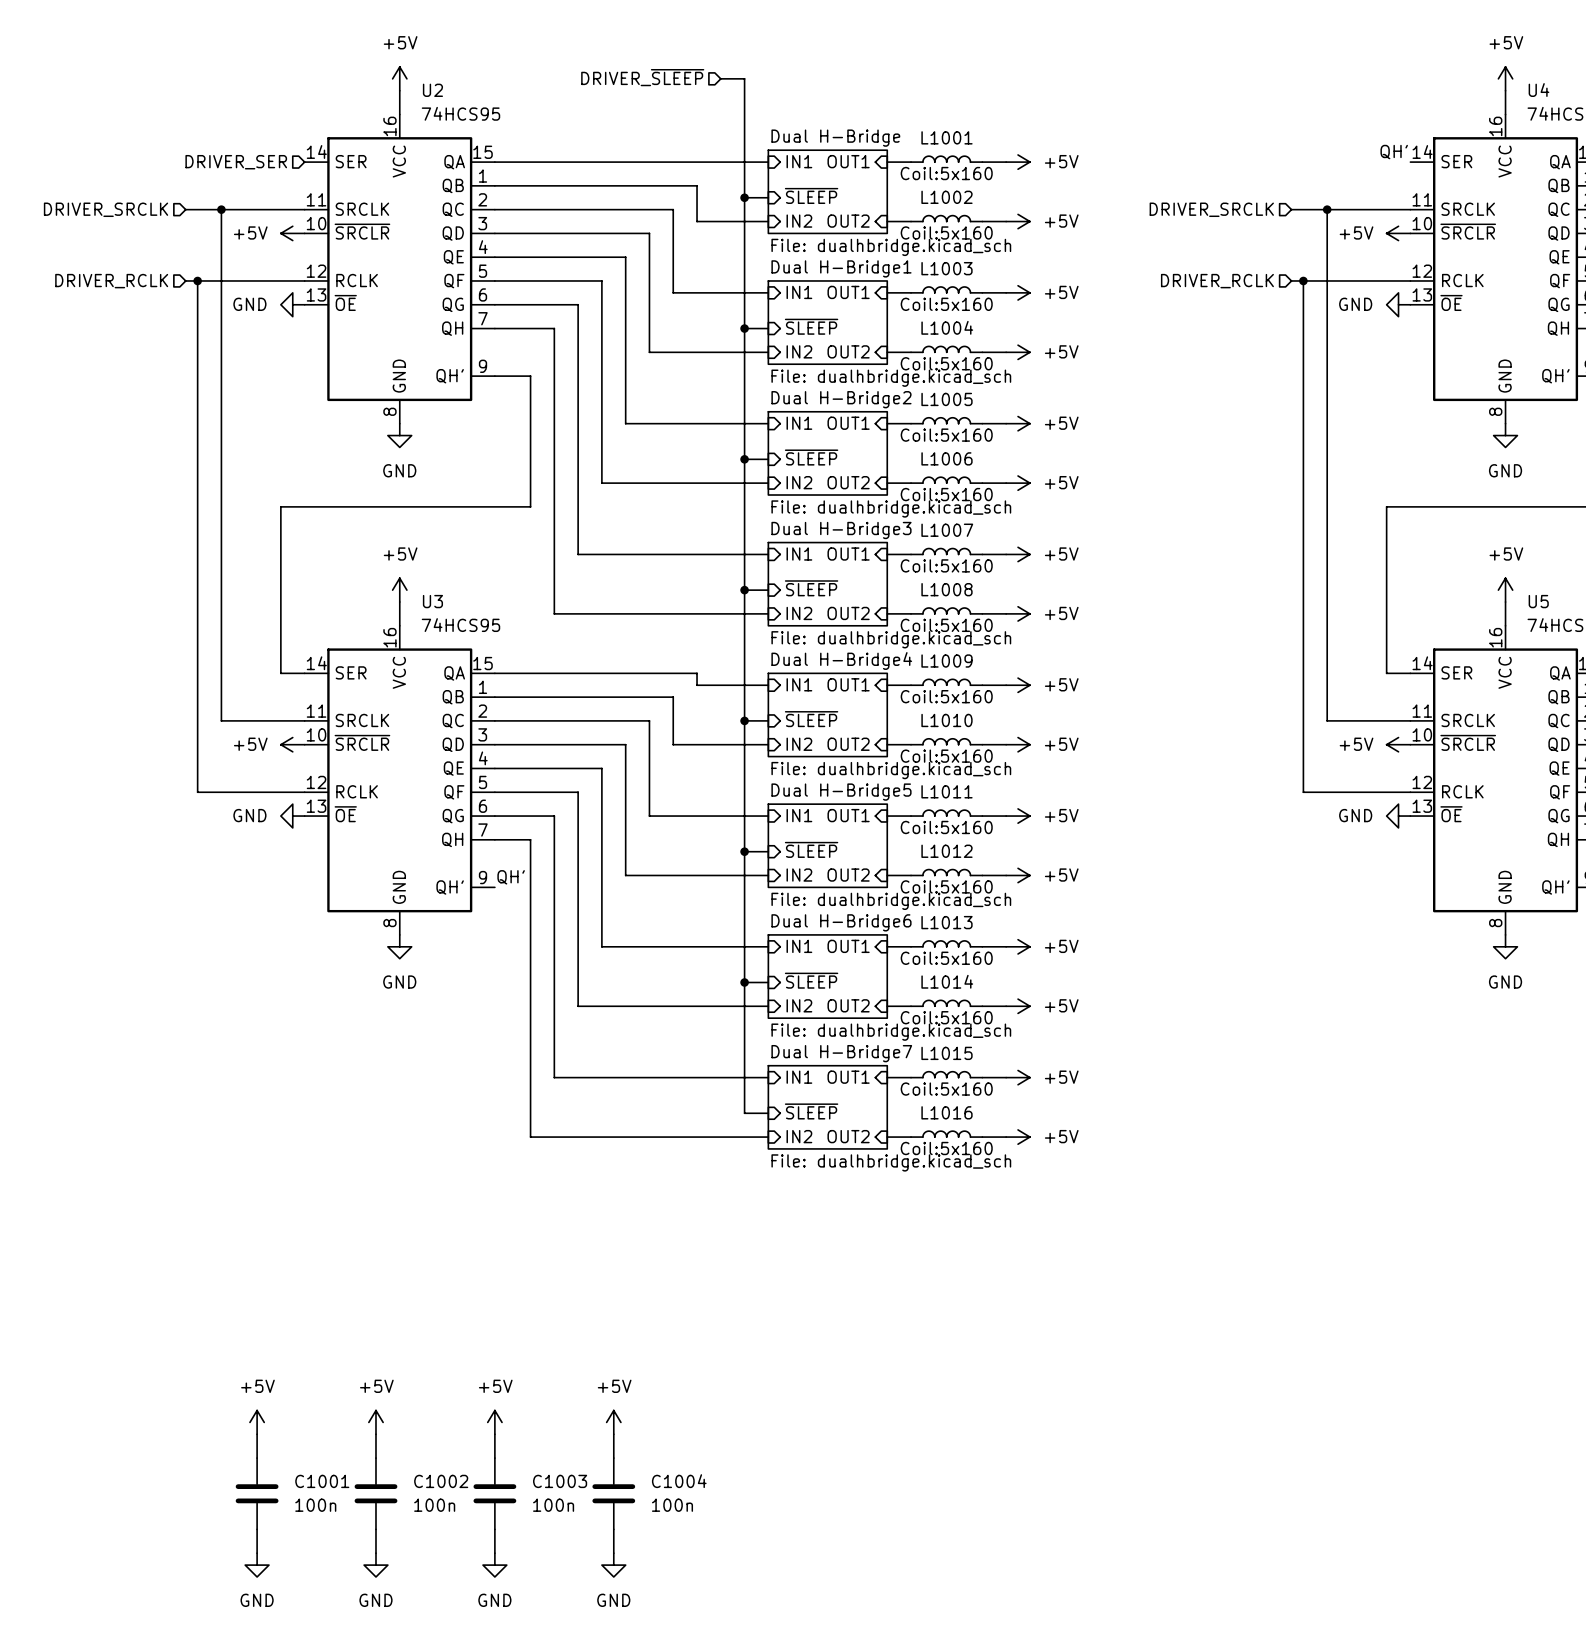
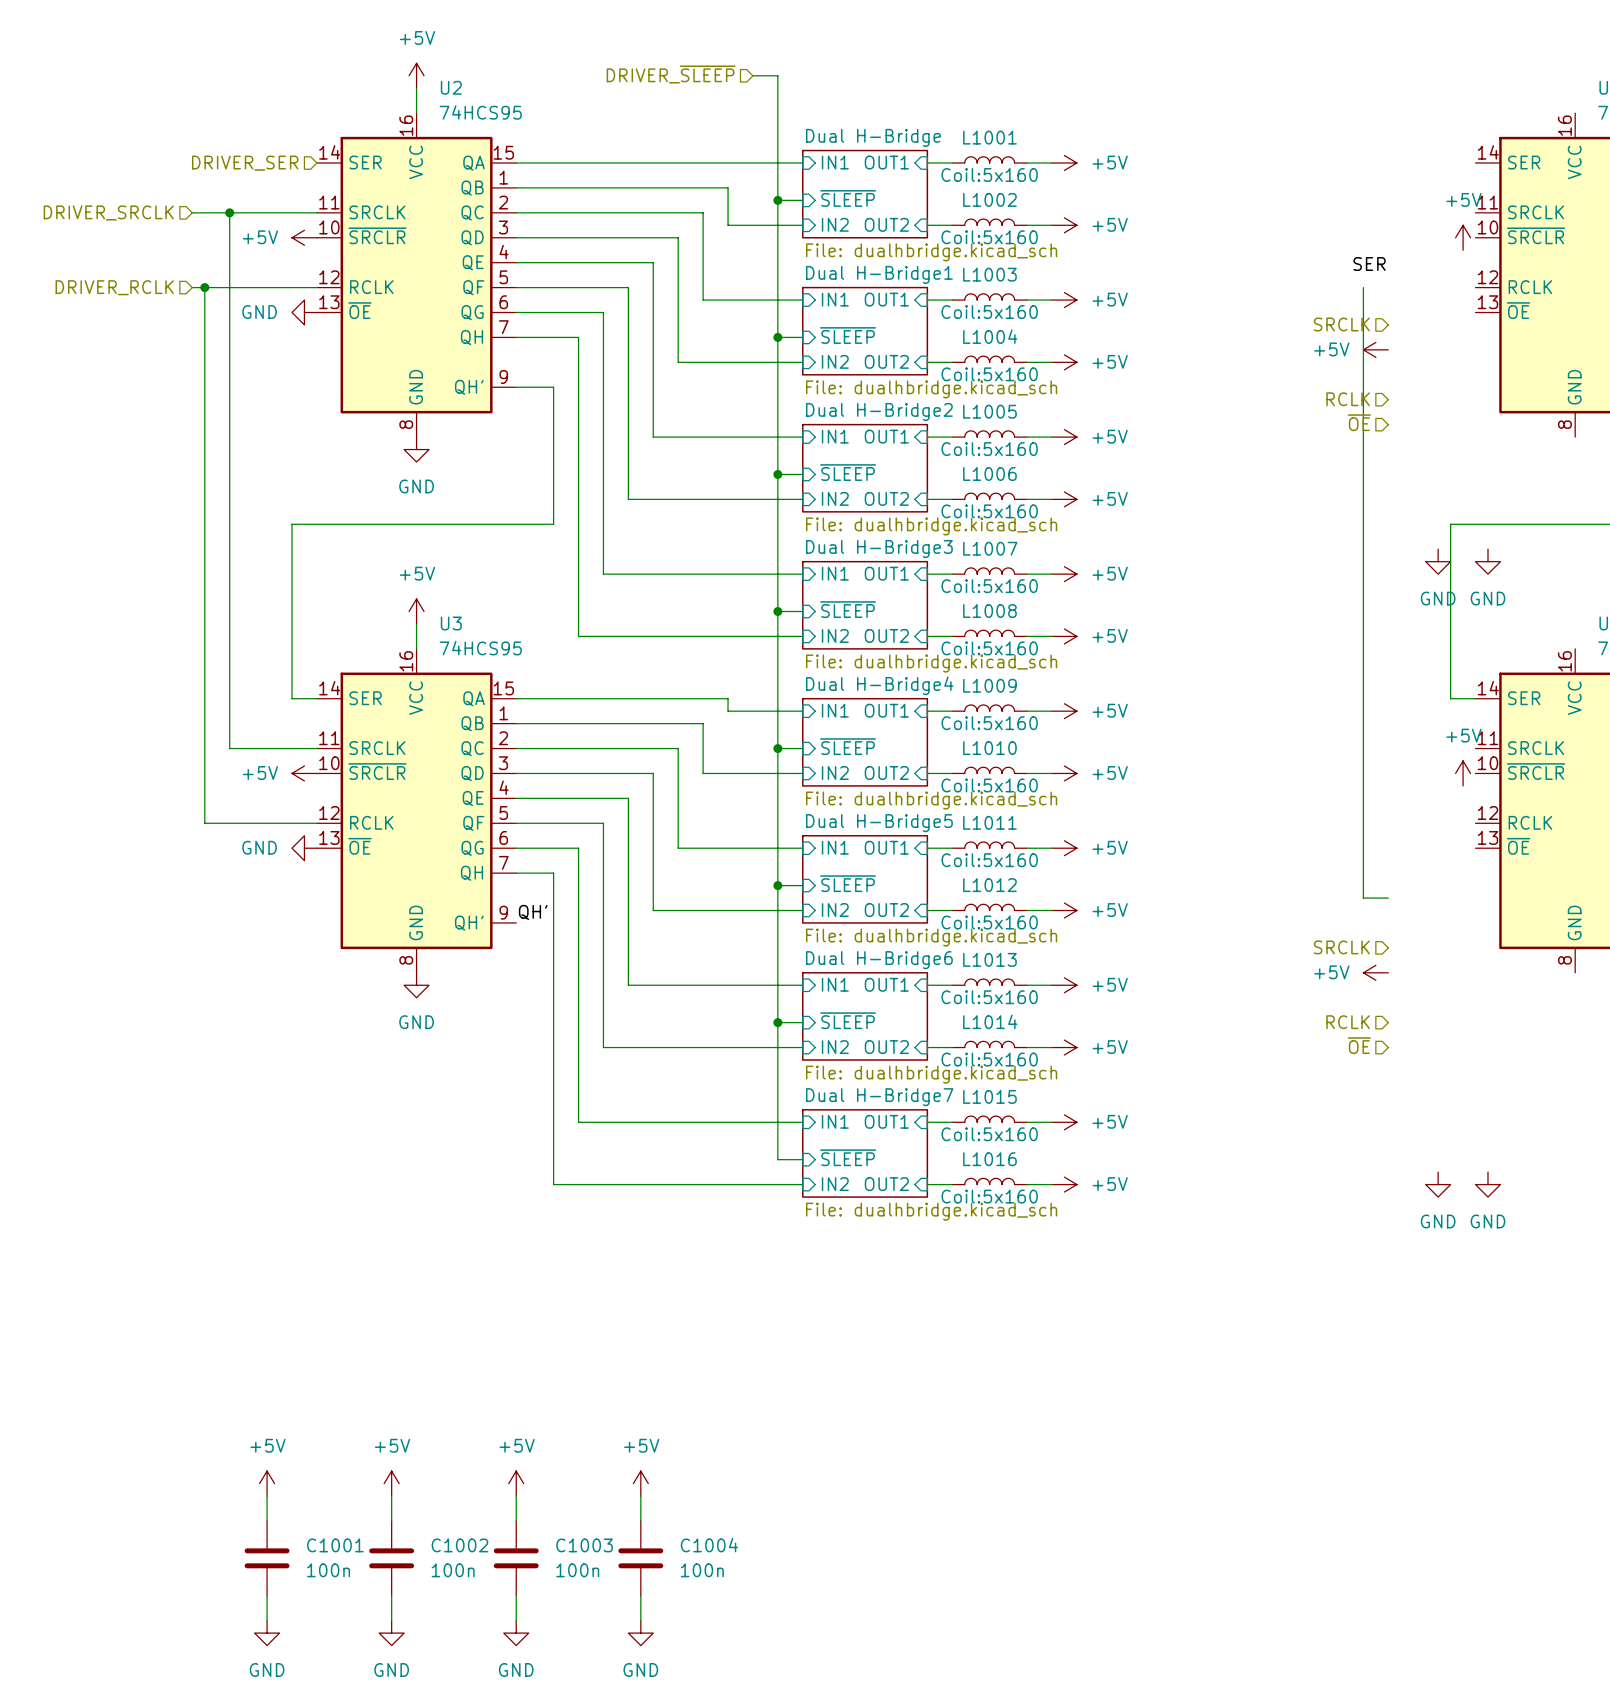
power symbol: +5V (1505, 78) -> none
wire: (1505, 90) (1505, 114) -> none
label: QH' (1394, 152) -> none
hierarchical label: DRIVER_SRCLK (1211, 209) -> none
wire: (1291, 209) (1410, 209) -> none
wire: (1327, 209) (1327, 720) (1410, 720) -> none
junction: (1327, 209) -> none
power symbol rotation: 0° (1398, 233) -> 90° clockwise (1463, 237)
label: none -> SER (1369, 264)
wire: (1291, 280) (1410, 280) -> none
junction: (1303, 280) -> none
hierarchical label: DRIVER_RCLK (1217, 281) -> none
power symbol: GND (1398, 304) -> none
hierarchical label: none -> SRCLK (1341, 324)
power symbol: none -> +5V (1375, 349)
hierarchical label: none -> RCLK (1348, 399)
hierarchical label: none -> ~{OE} (1359, 422)
power symbol: GND (1505, 435) -> none
power symbol: none -> GND (1438, 561)
power symbol: none -> GND (1487, 561)
power symbol: +5V (1505, 590) -> none
wire: (1505, 602) (1505, 625) -> none
power symbol rotation: 0° (1398, 744) -> 90° clockwise (1463, 773)
wire: (1303, 792) (1410, 792) -> (1363, 823) (1363, 898) (1388, 898)
power symbol: GND (1398, 816) -> none
hierarchical label: none -> SRCLK (1341, 947)
power symbol: none -> +5V (1375, 972)
power symbol: GND (1505, 946) -> none
hierarchical label: none -> RCLK (1348, 1022)
hierarchical label: none -> ~{OE} (1359, 1045)
power symbol: none -> GND (1438, 1184)
power symbol: none -> GND (1487, 1184)

